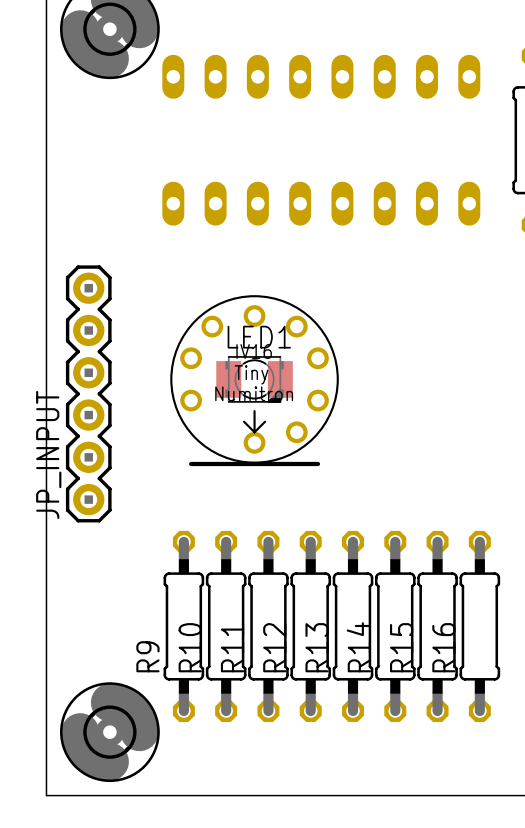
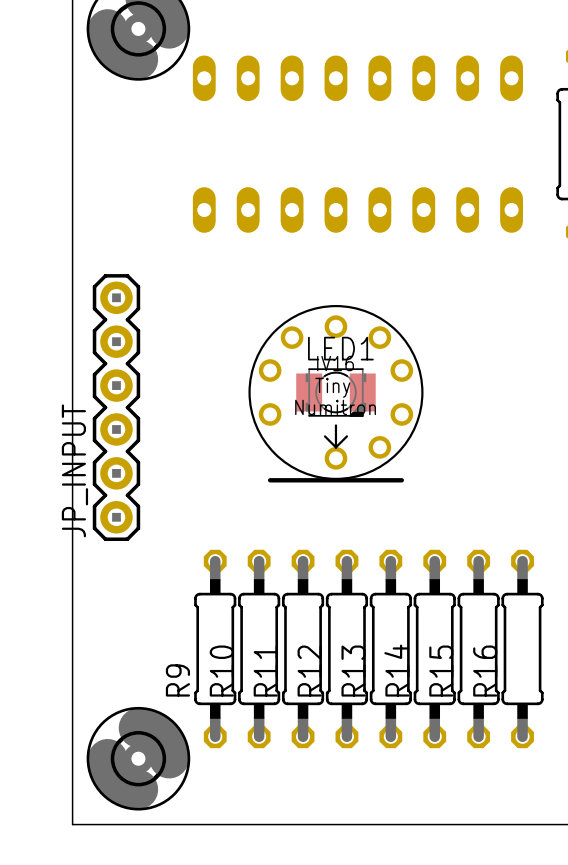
LED1 position: (254, 379) -> (335, 392)
part position: (254, 380) -> (335, 393)

